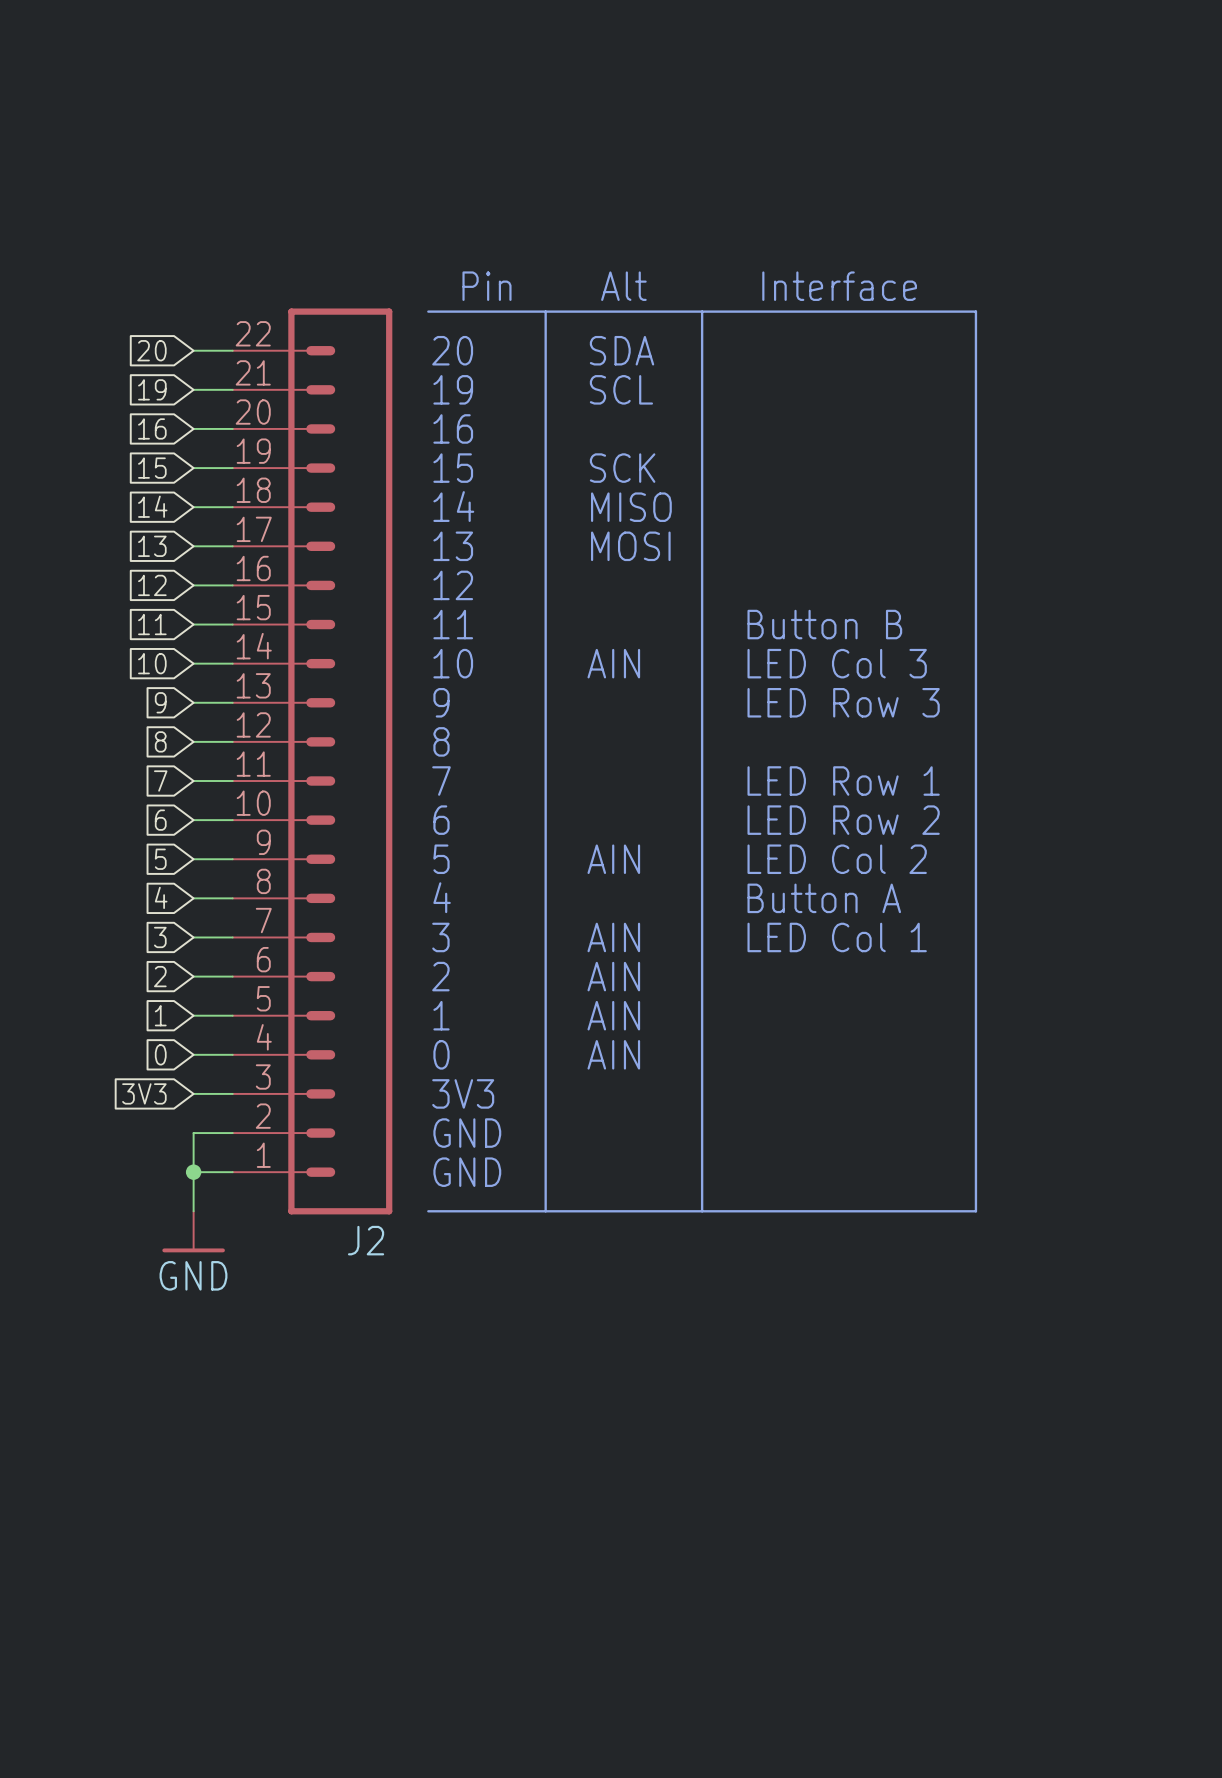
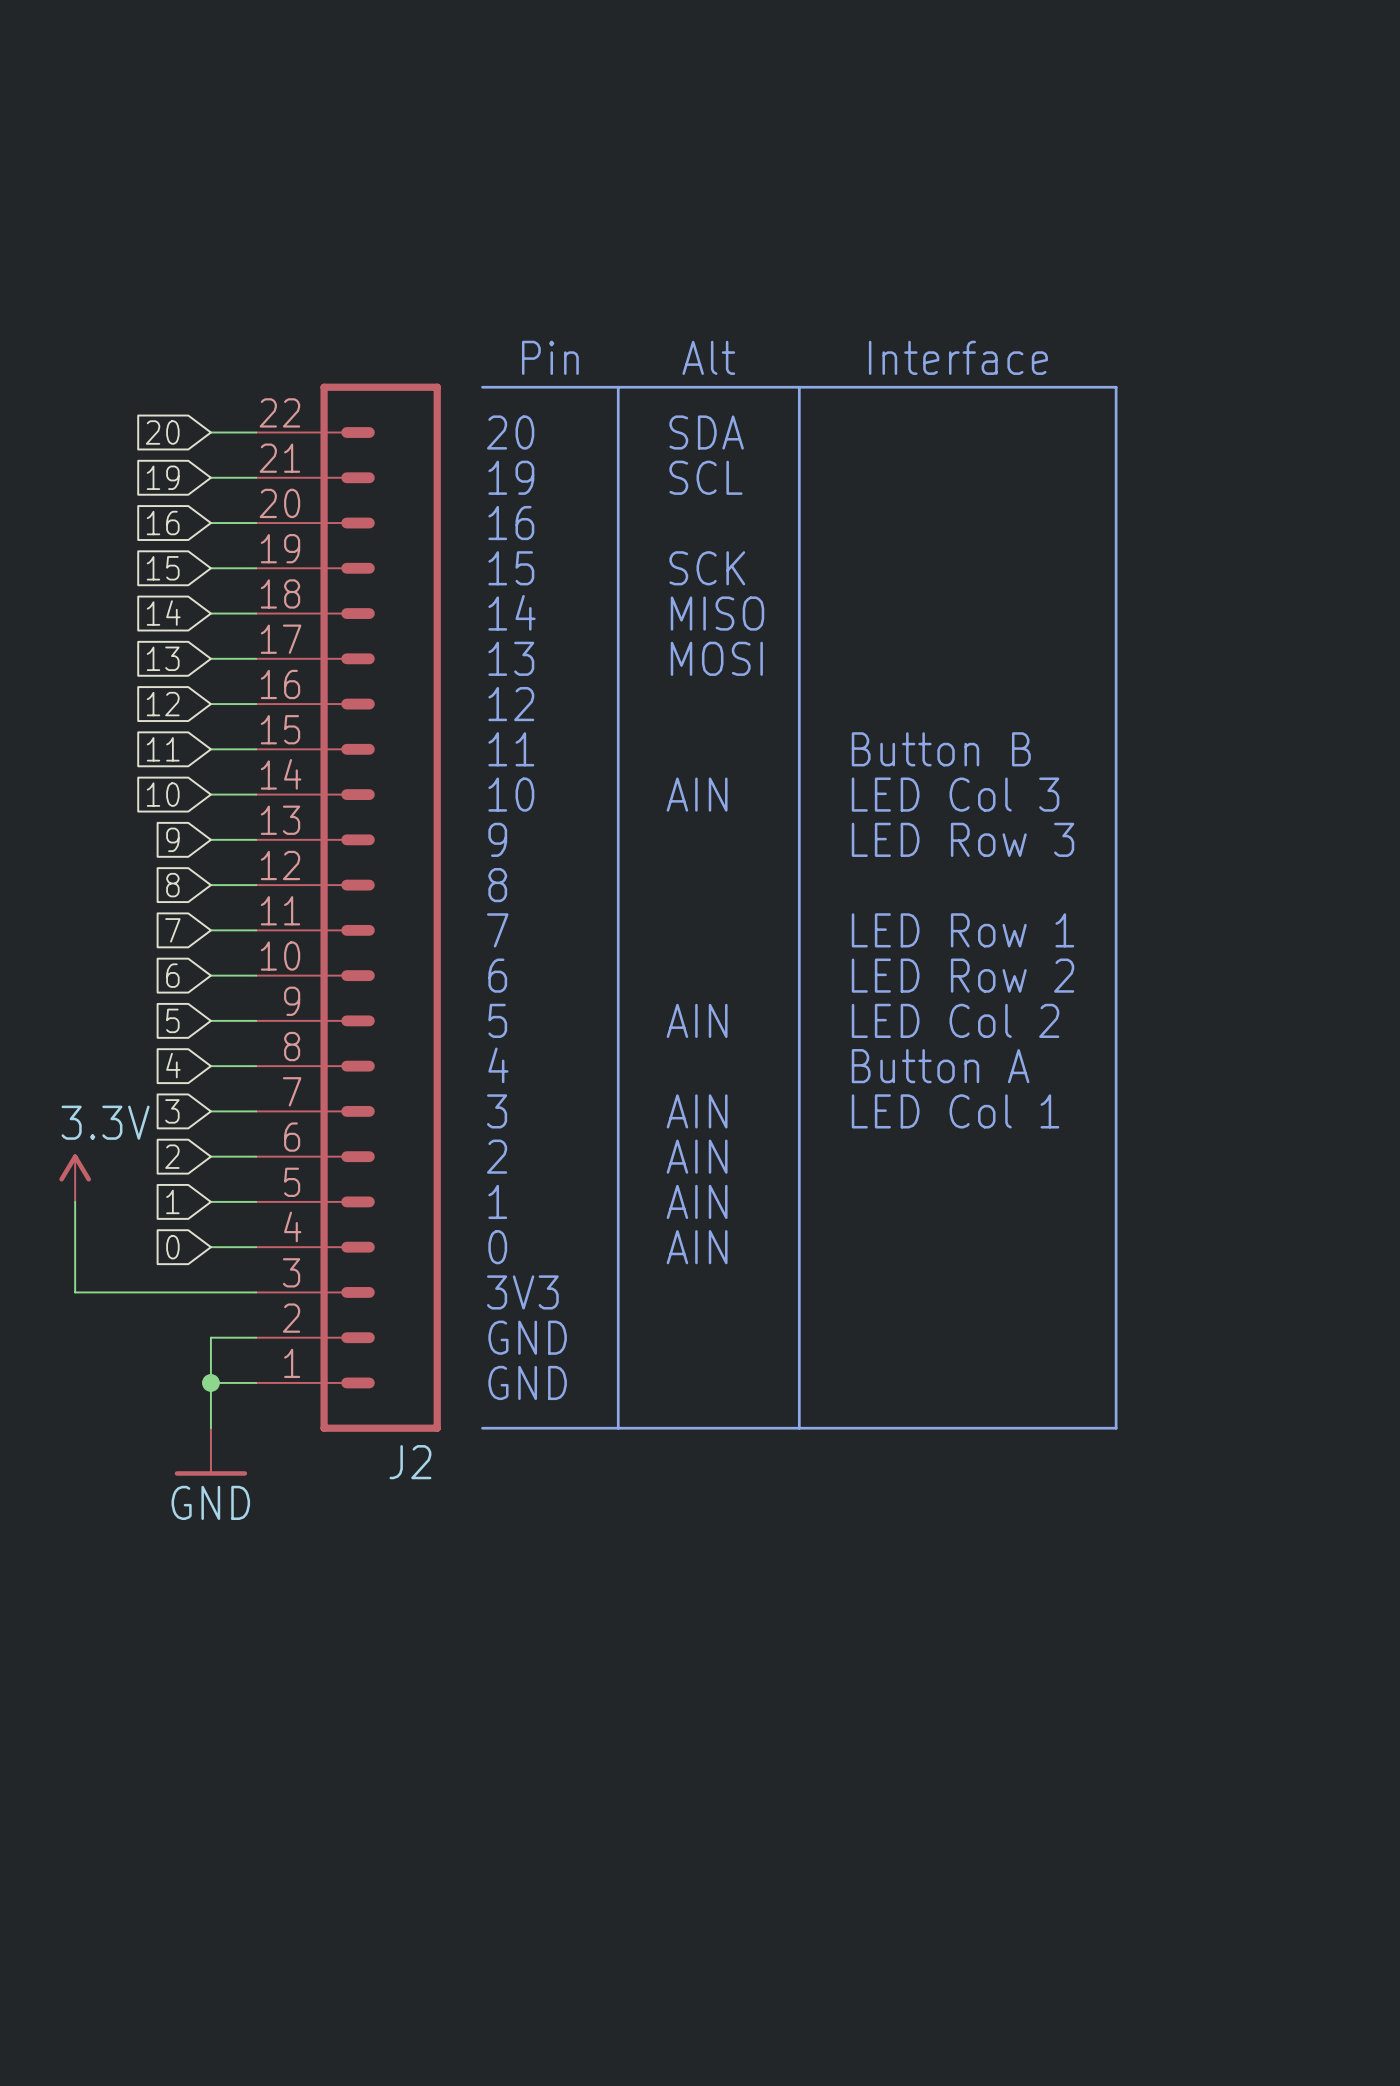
power symbol: none -> 3.3V (75, 1178)
wire: none -> (75, 1201) (75, 1292) (210, 1292)
global label: 3V3 (144, 1093) -> none

